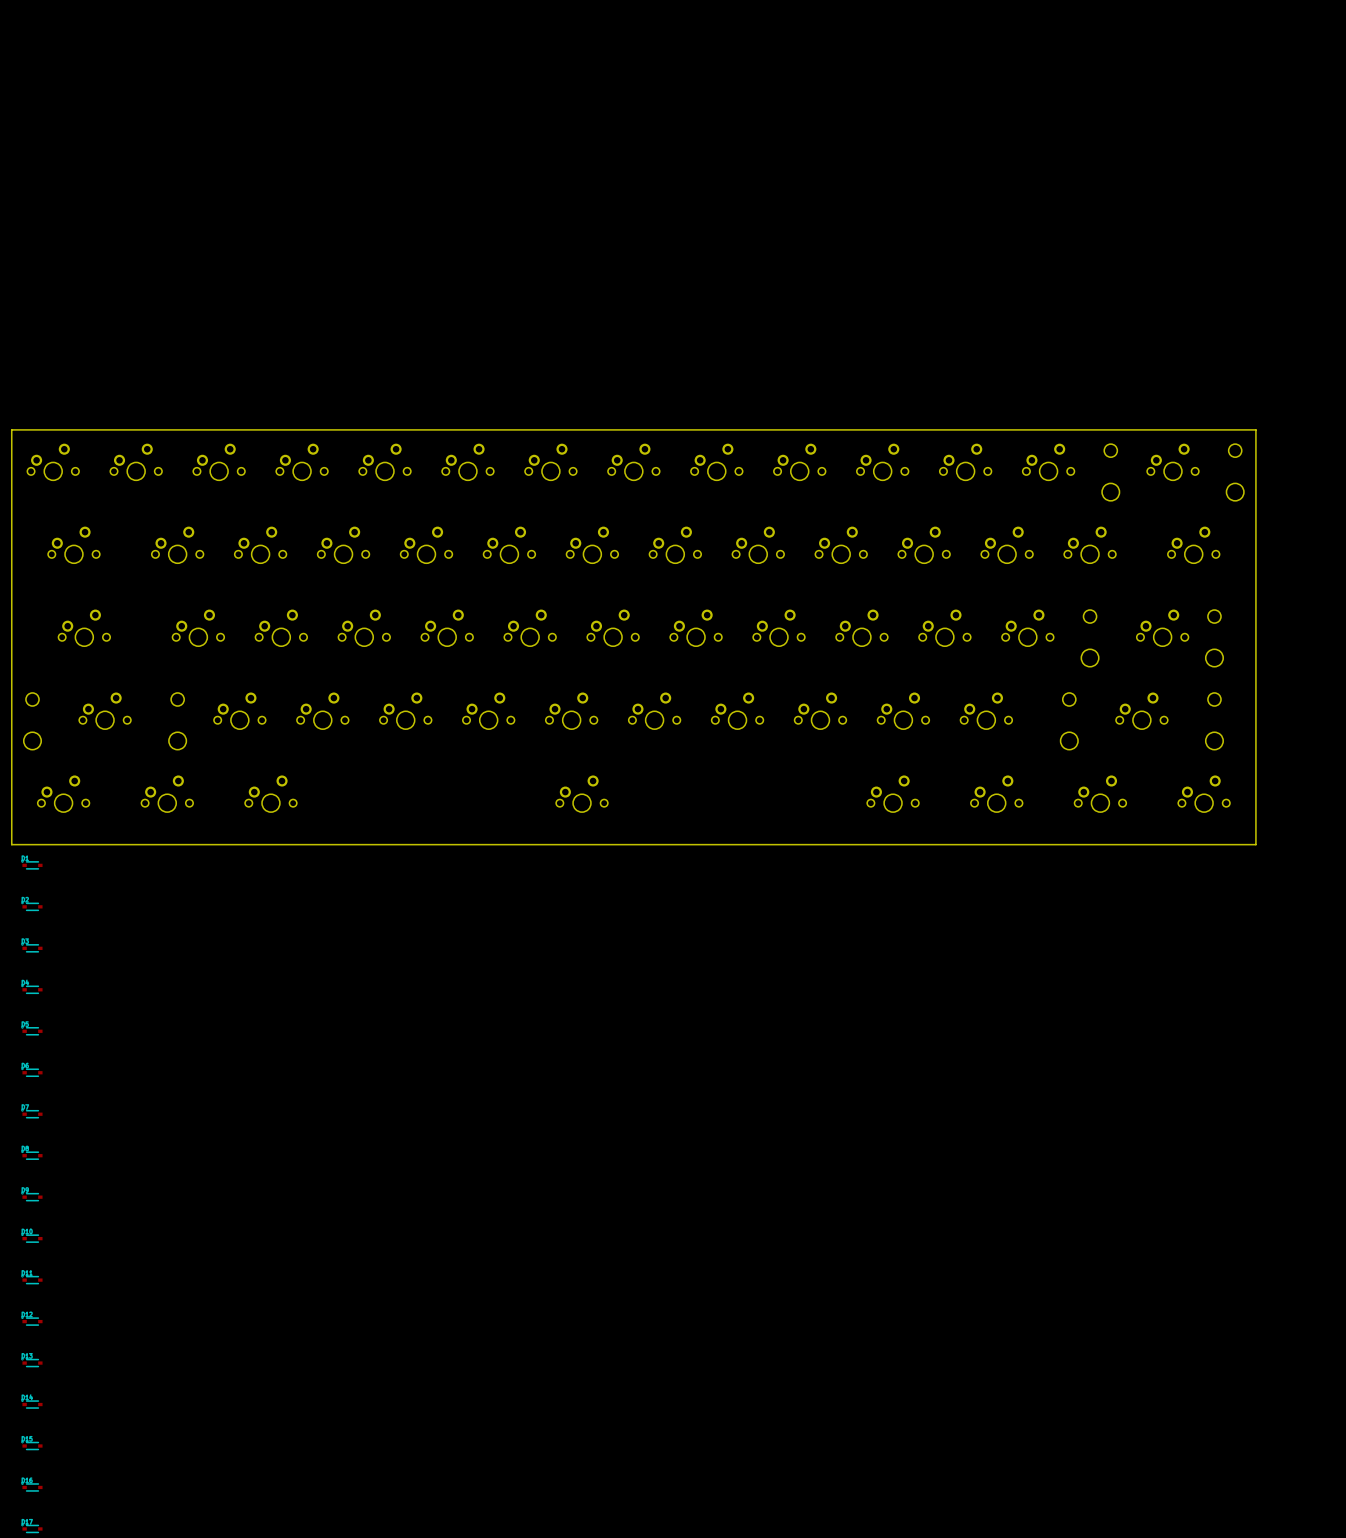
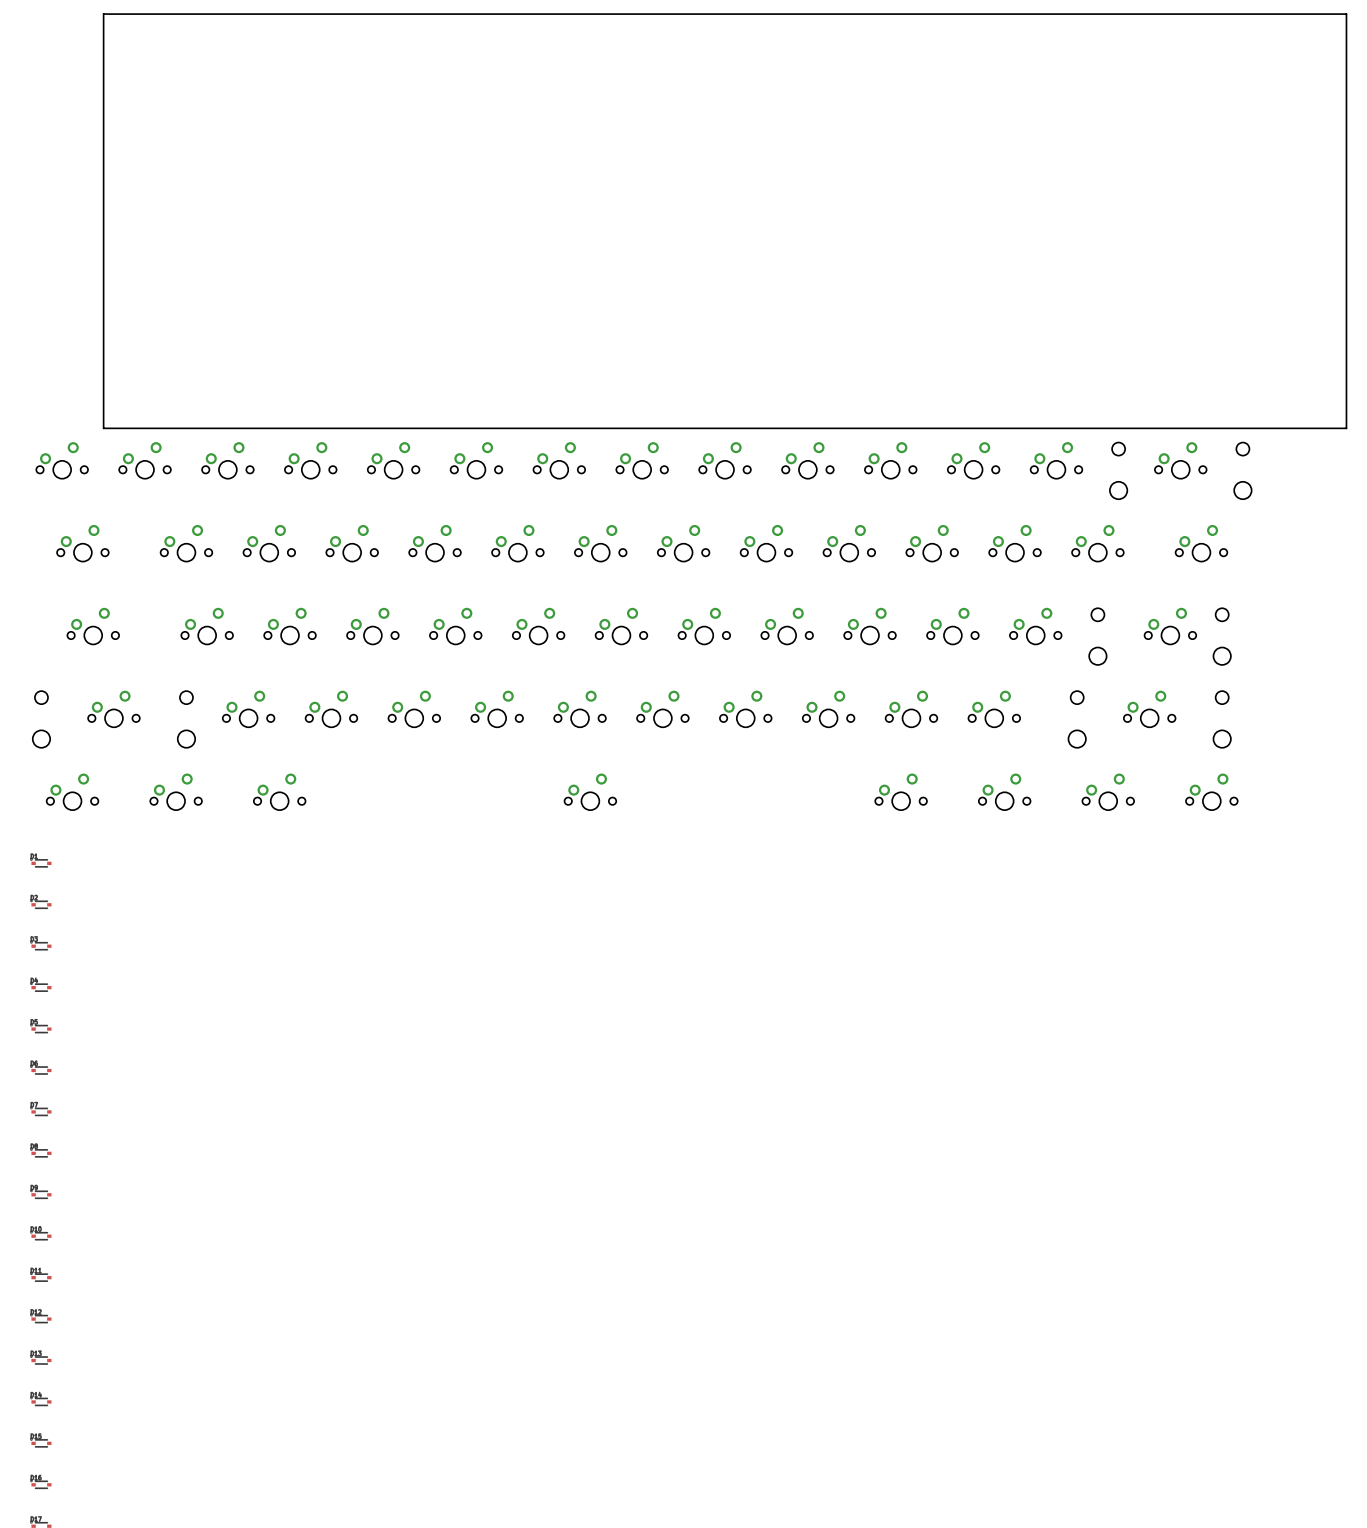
board edge: (94, 429) (11, 429) (11, 844) (1255, 844) (1255, 429) -> (103, 428) (103, 14) (1346, 14) (1346, 428) (1263, 428)

